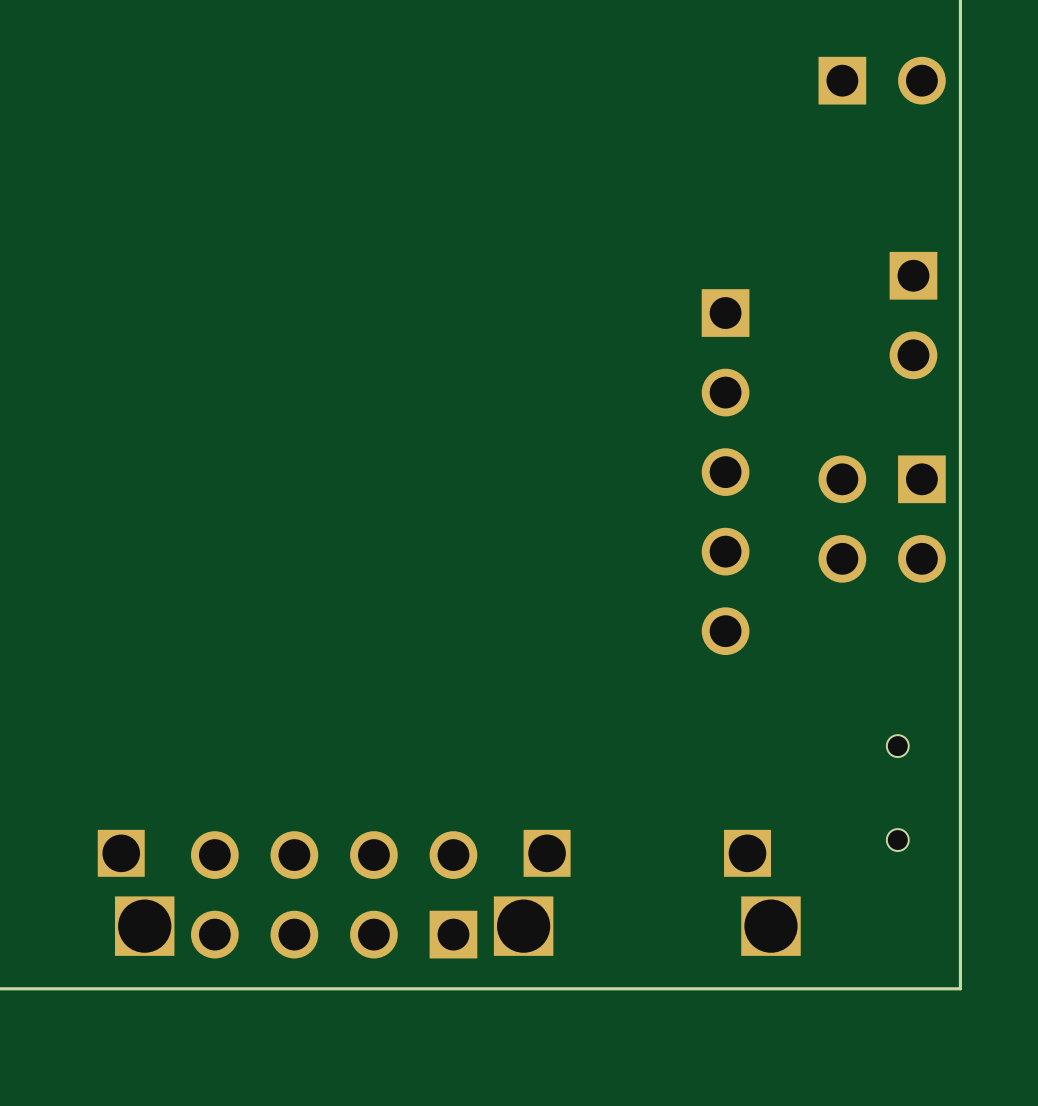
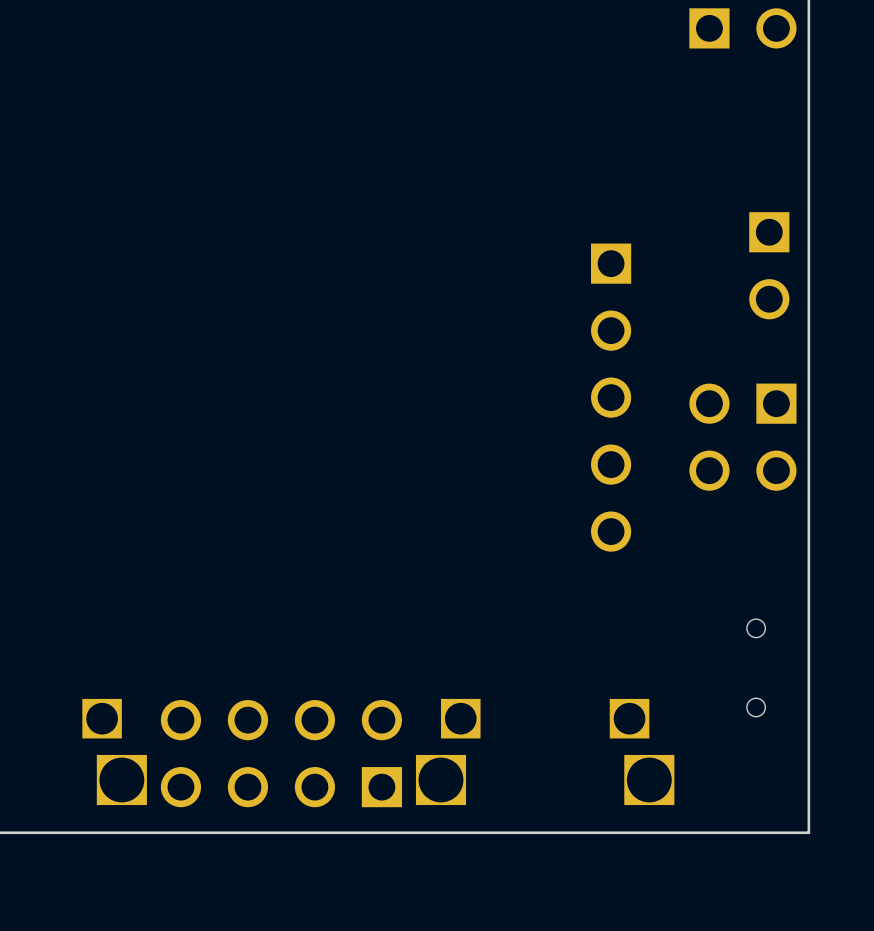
part position: (882, 80) -> (742, 28)

